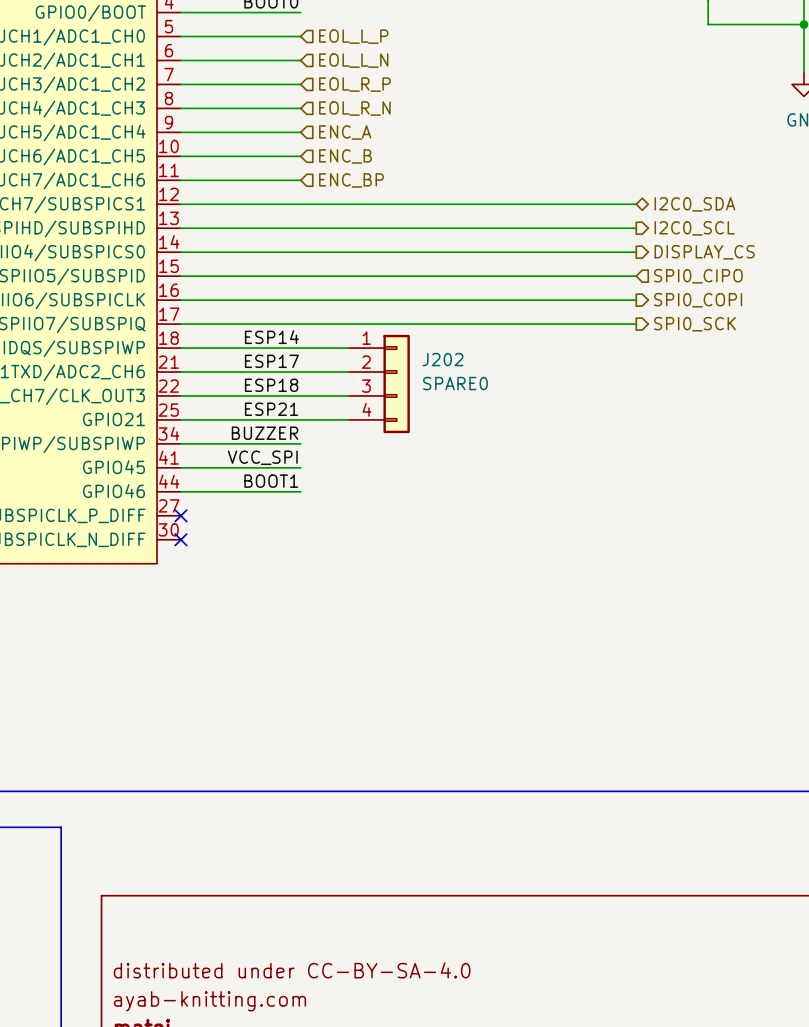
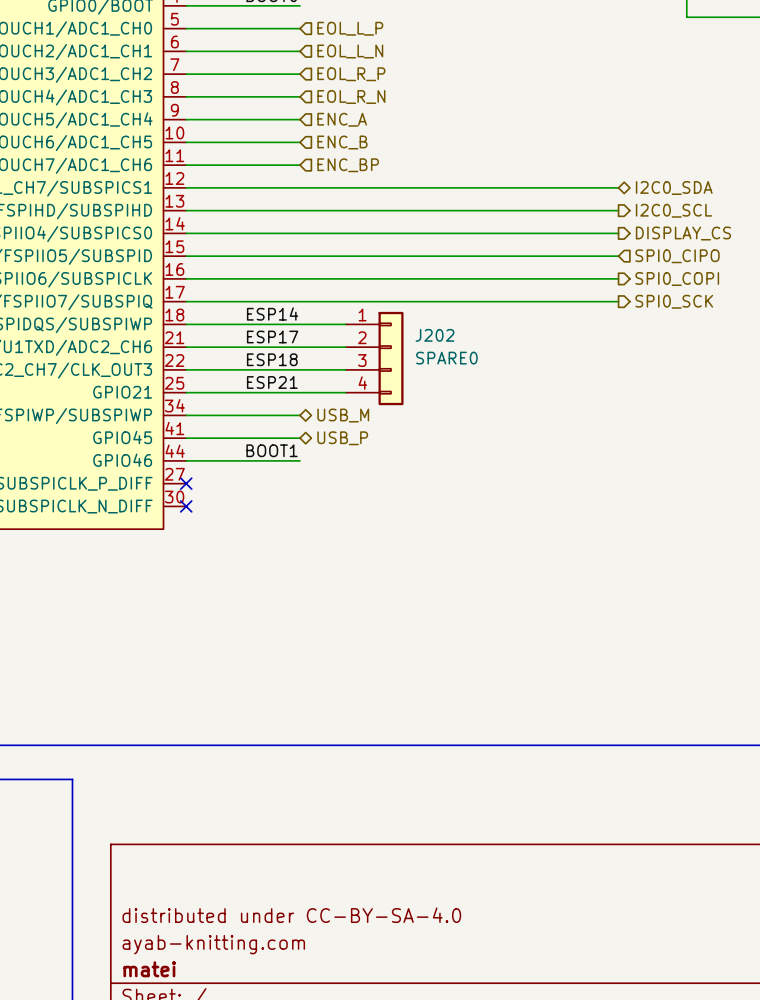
label: BUZZER (265, 433) -> none
hierarchical label: none -> USB_M (343, 415)
label: VCC_SPI (262, 457) -> none
hierarchical label: none -> USB_P (342, 438)

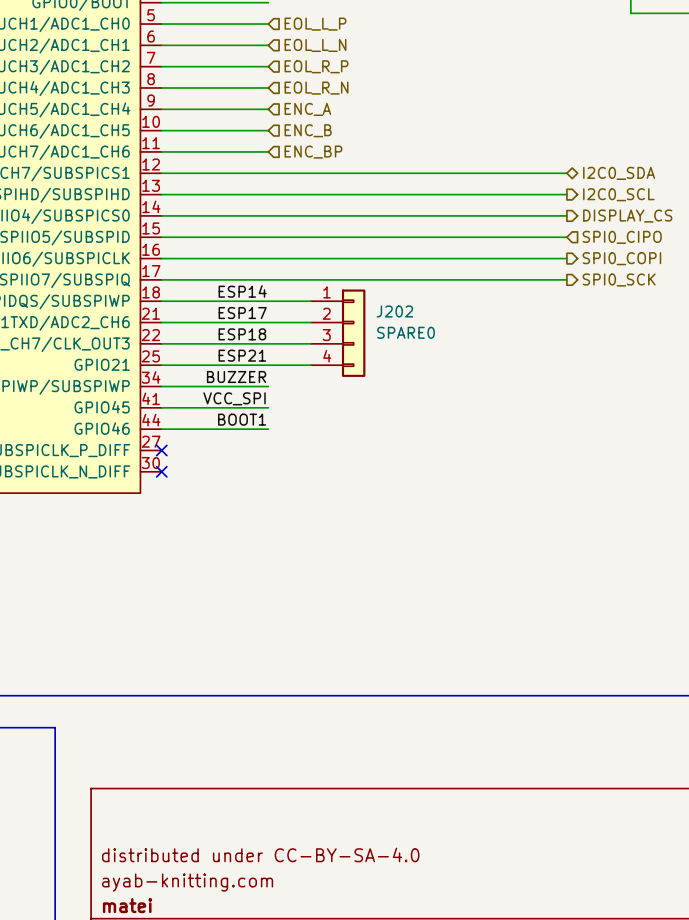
label: none -> BUZZER (236, 377)
hierarchical label: USB_M (343, 415) -> none
label: none -> VCC_SPI (234, 398)
hierarchical label: USB_P (342, 438) -> none

